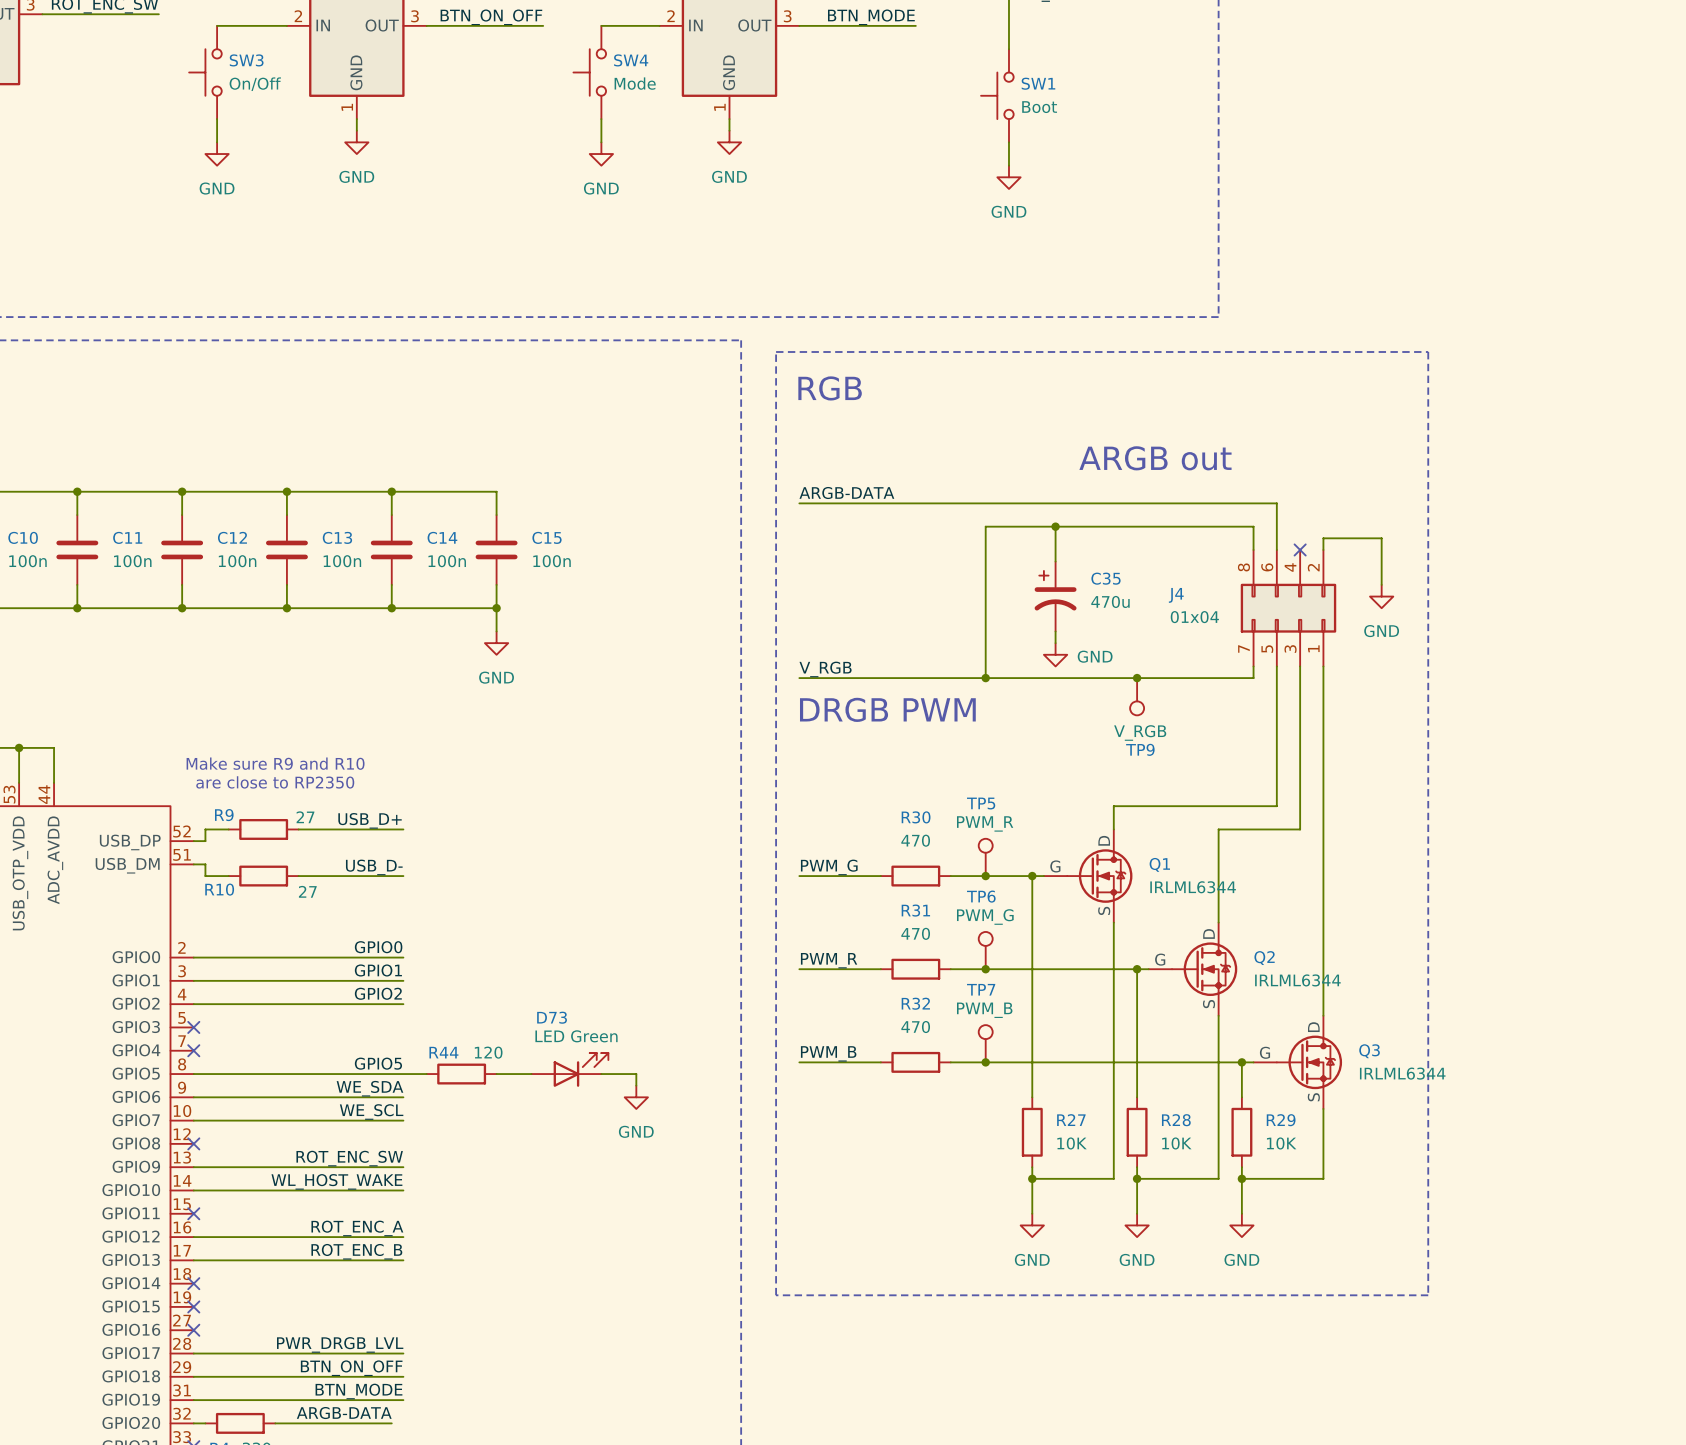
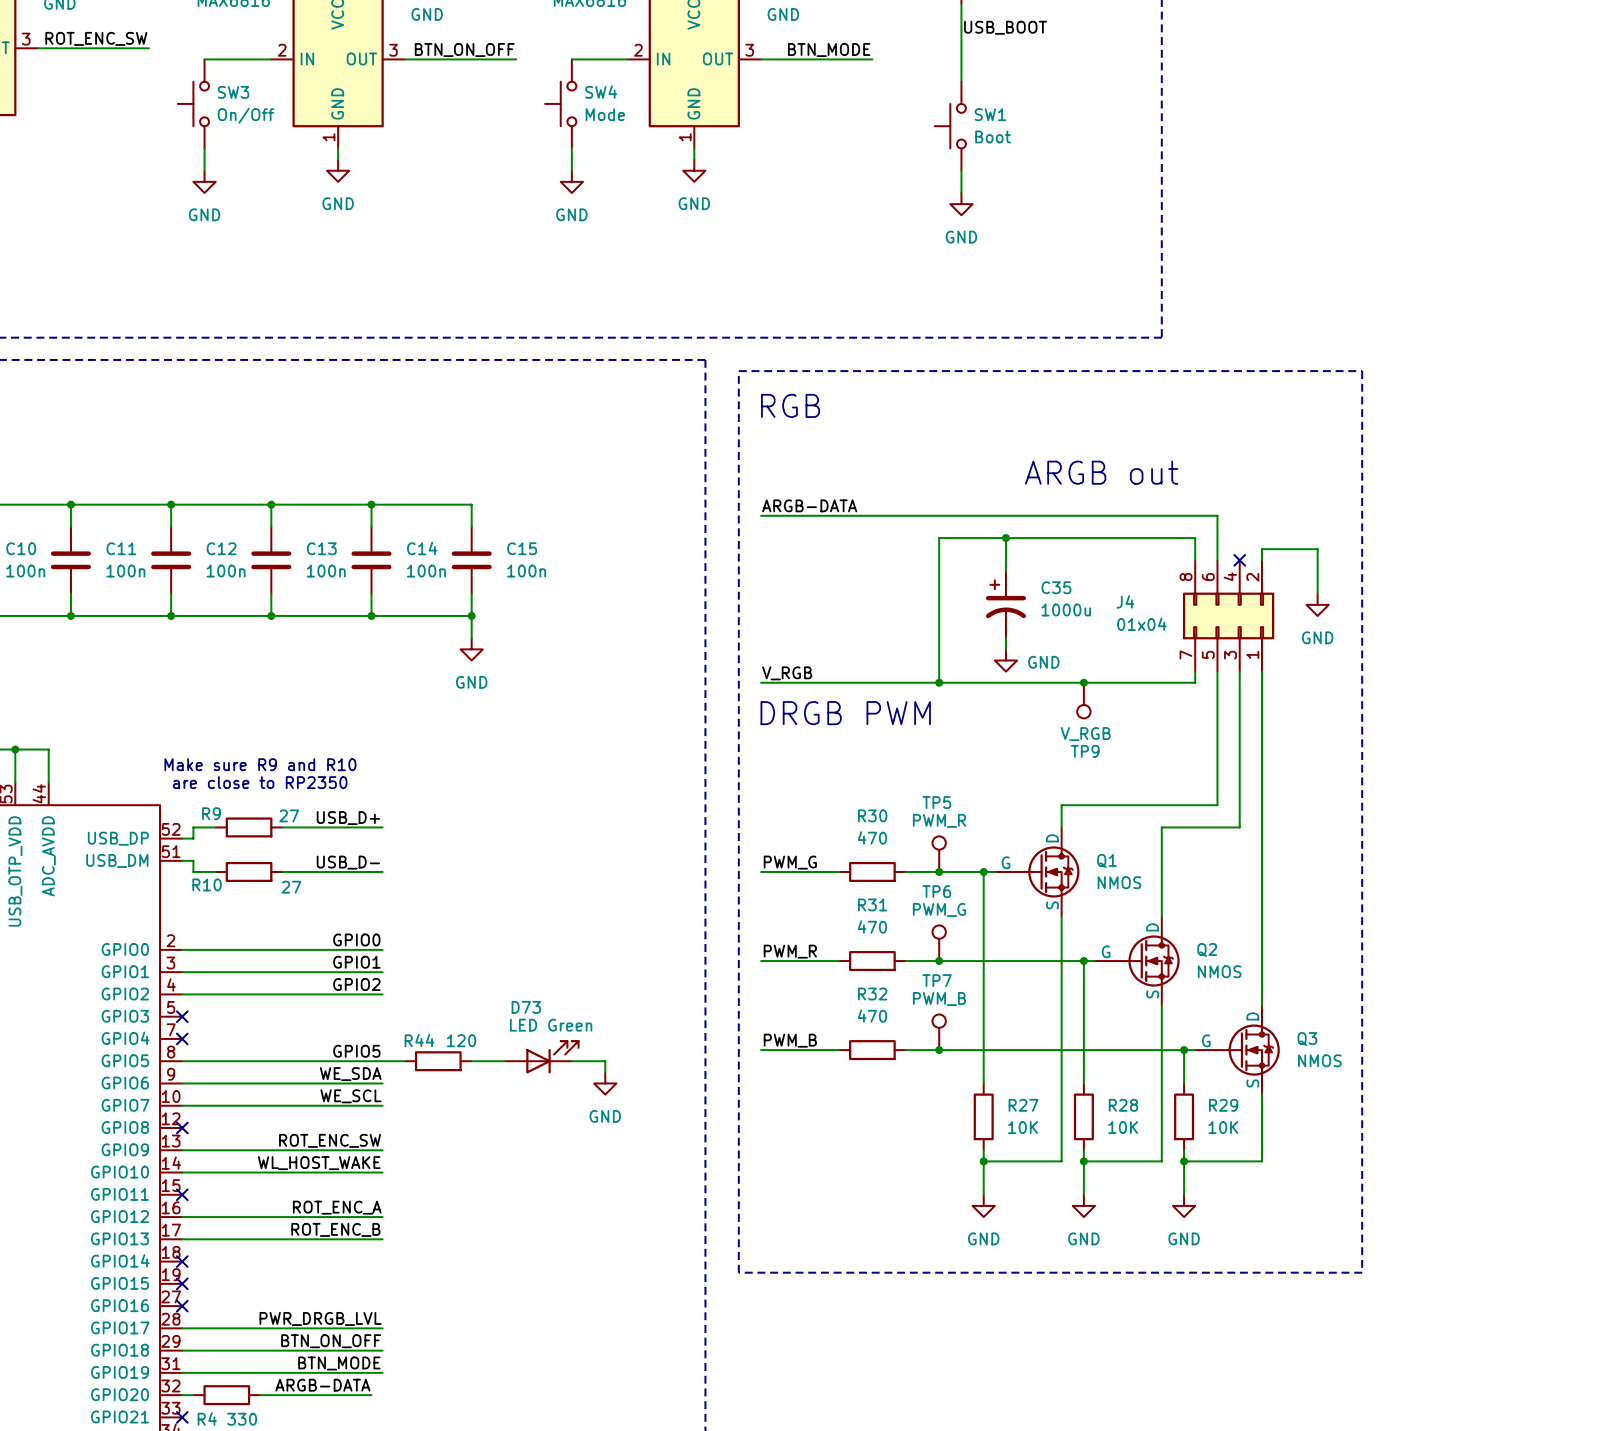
C35 value: 470u (1110, 601) -> 1000u (1066, 609)
Q1 value: IRLML6344 (1193, 887) -> NMOS (1119, 882)
Q2 value: IRLML6344 (1297, 980) -> NMOS (1219, 971)
Q3 value: IRLML6344 (1402, 1073) -> NMOS (1319, 1060)

